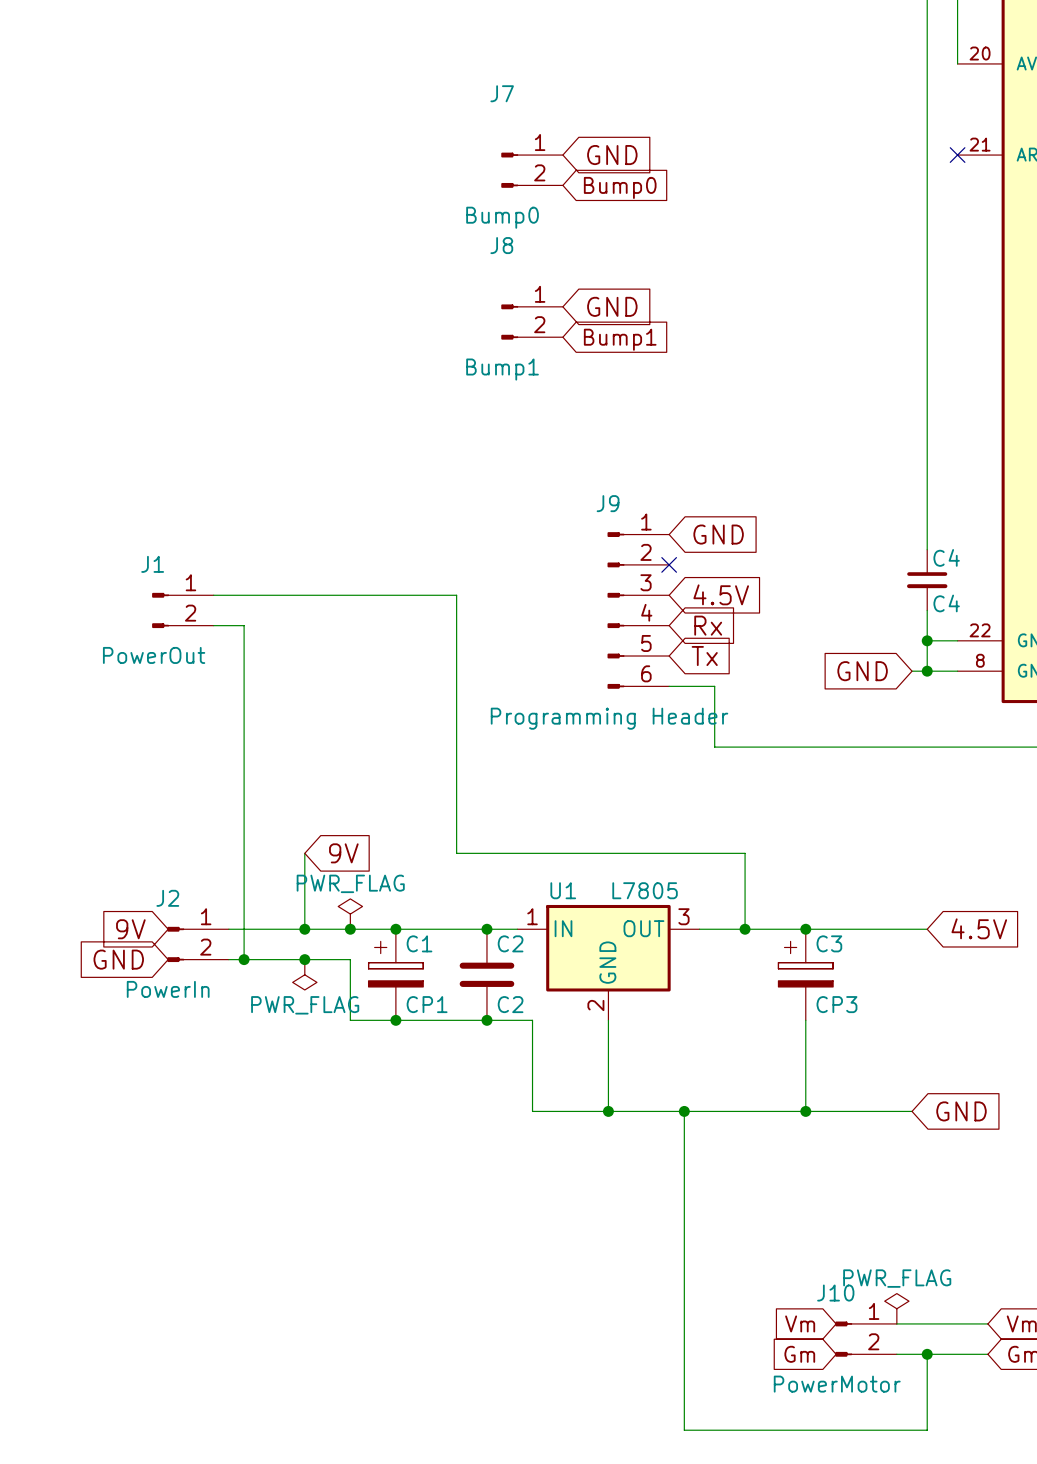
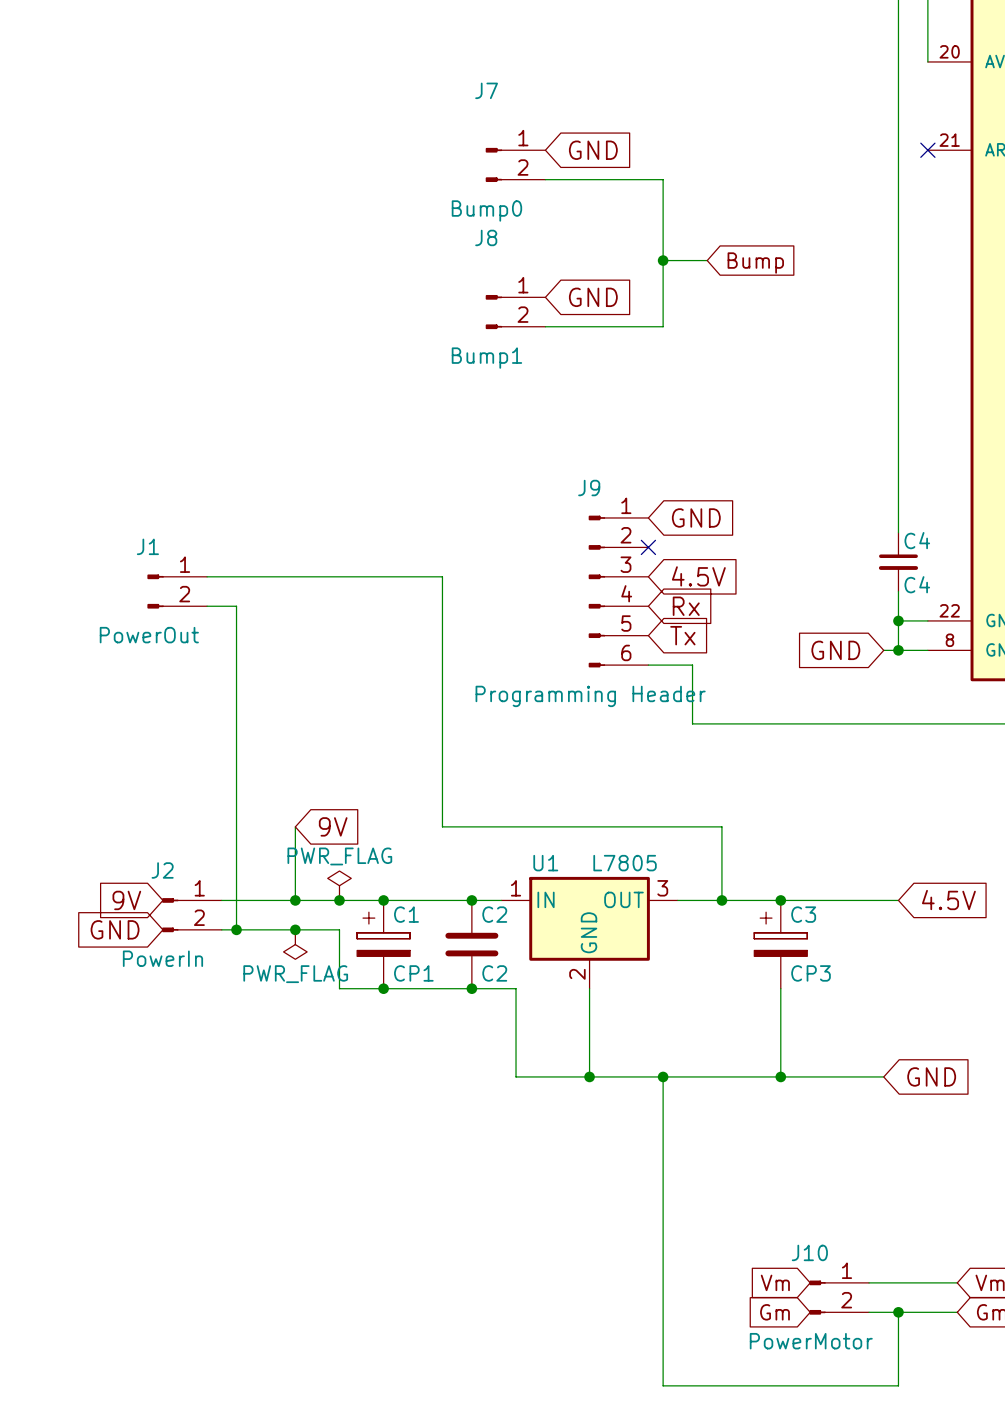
wire: none -> (545, 179) (663, 179) (663, 326) (545, 326)
global label: Bump0 (620, 187) -> none
wire: none -> (663, 260) (707, 260)
junction: none -> (663, 260)
global label: none -> Bump (755, 263)
global label: Bump1 (620, 339) -> none
power symbol: PWR_FLAG (896, 1308) -> none

